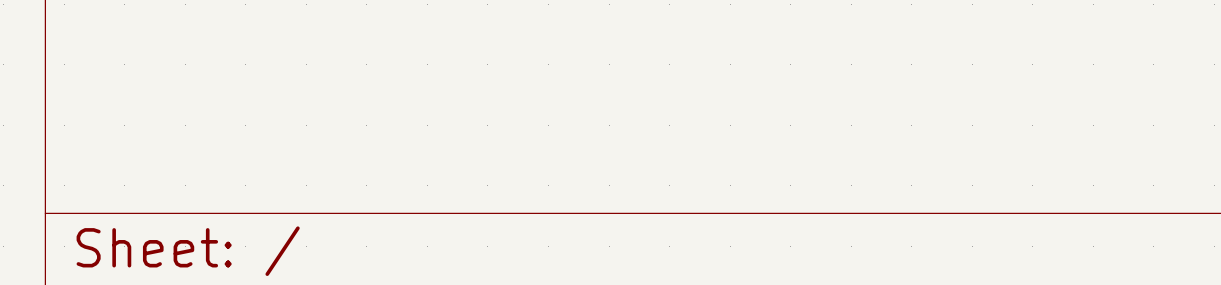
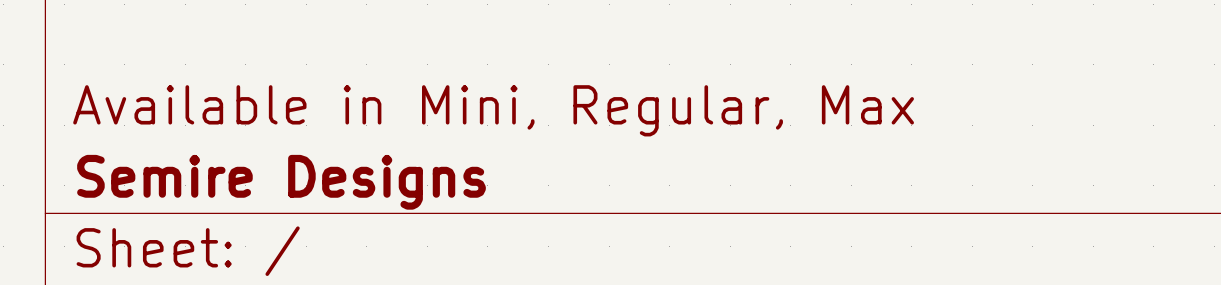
title block: none -> Available in Mini, Regular, Max (493, 110)
title block: none -> Semire Designs (281, 182)

